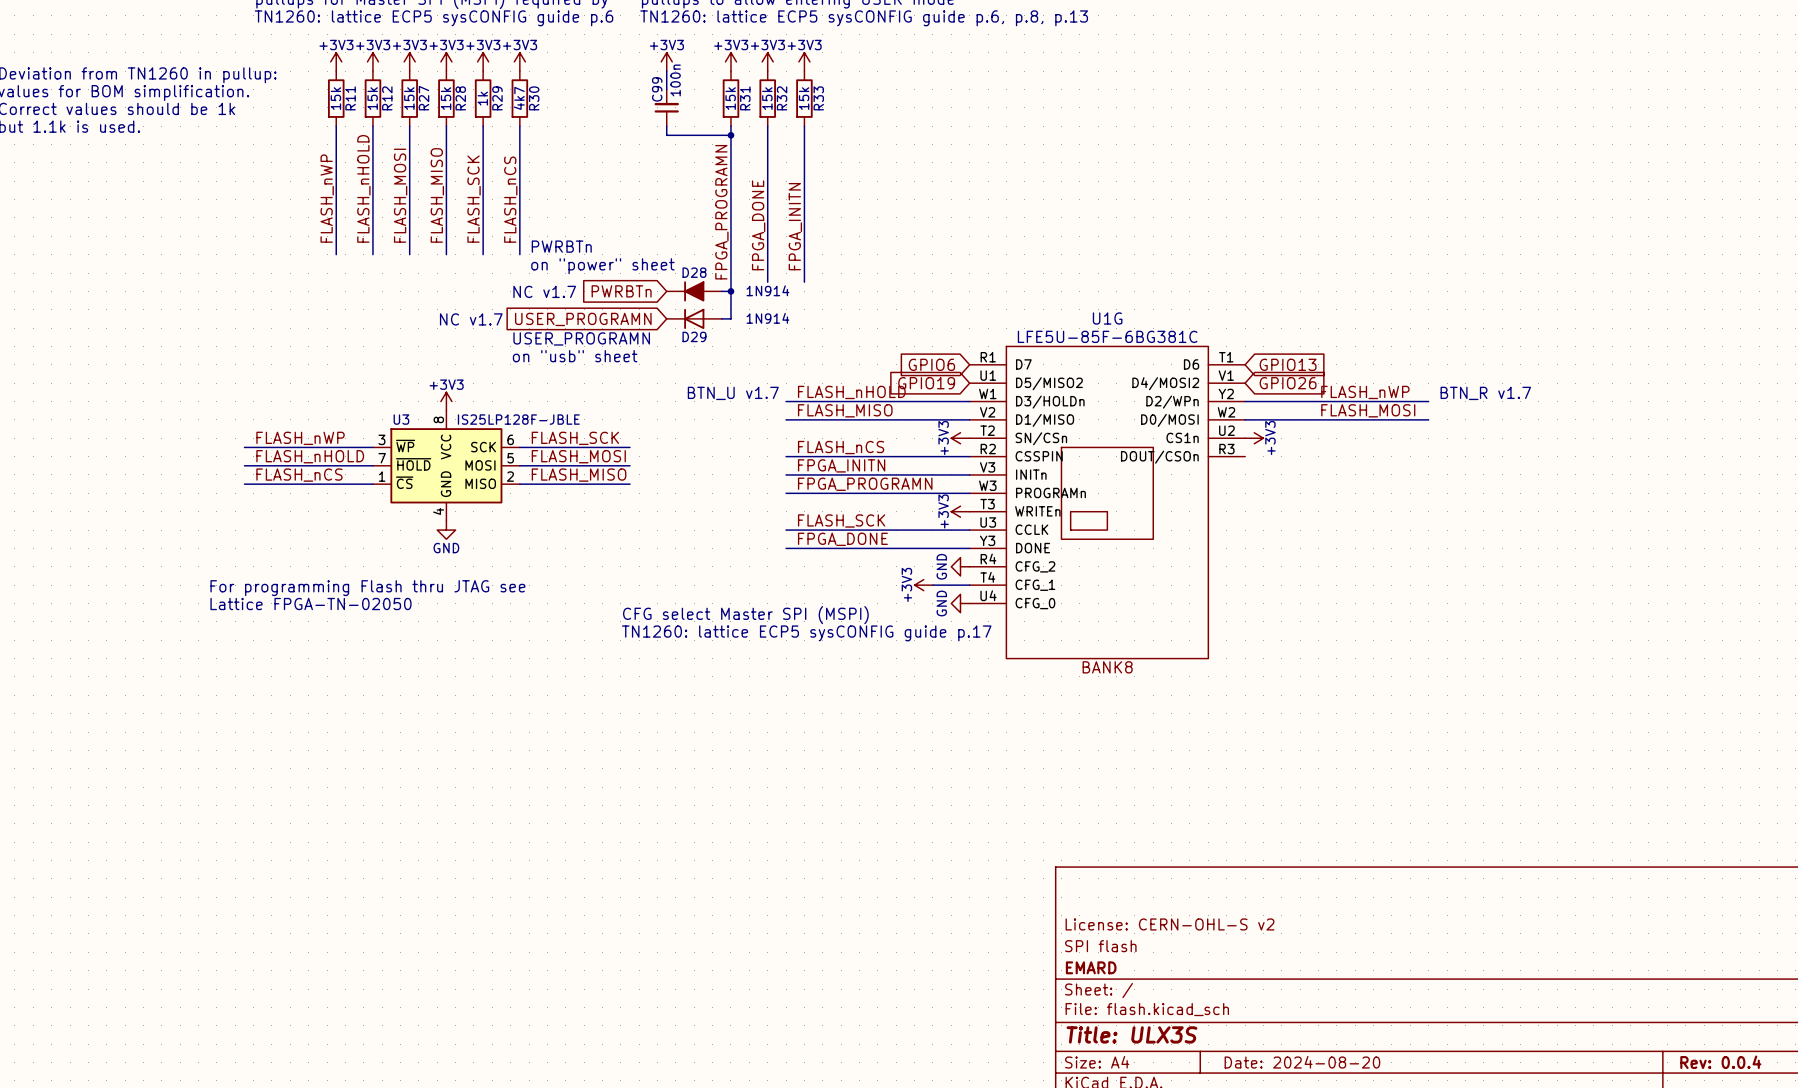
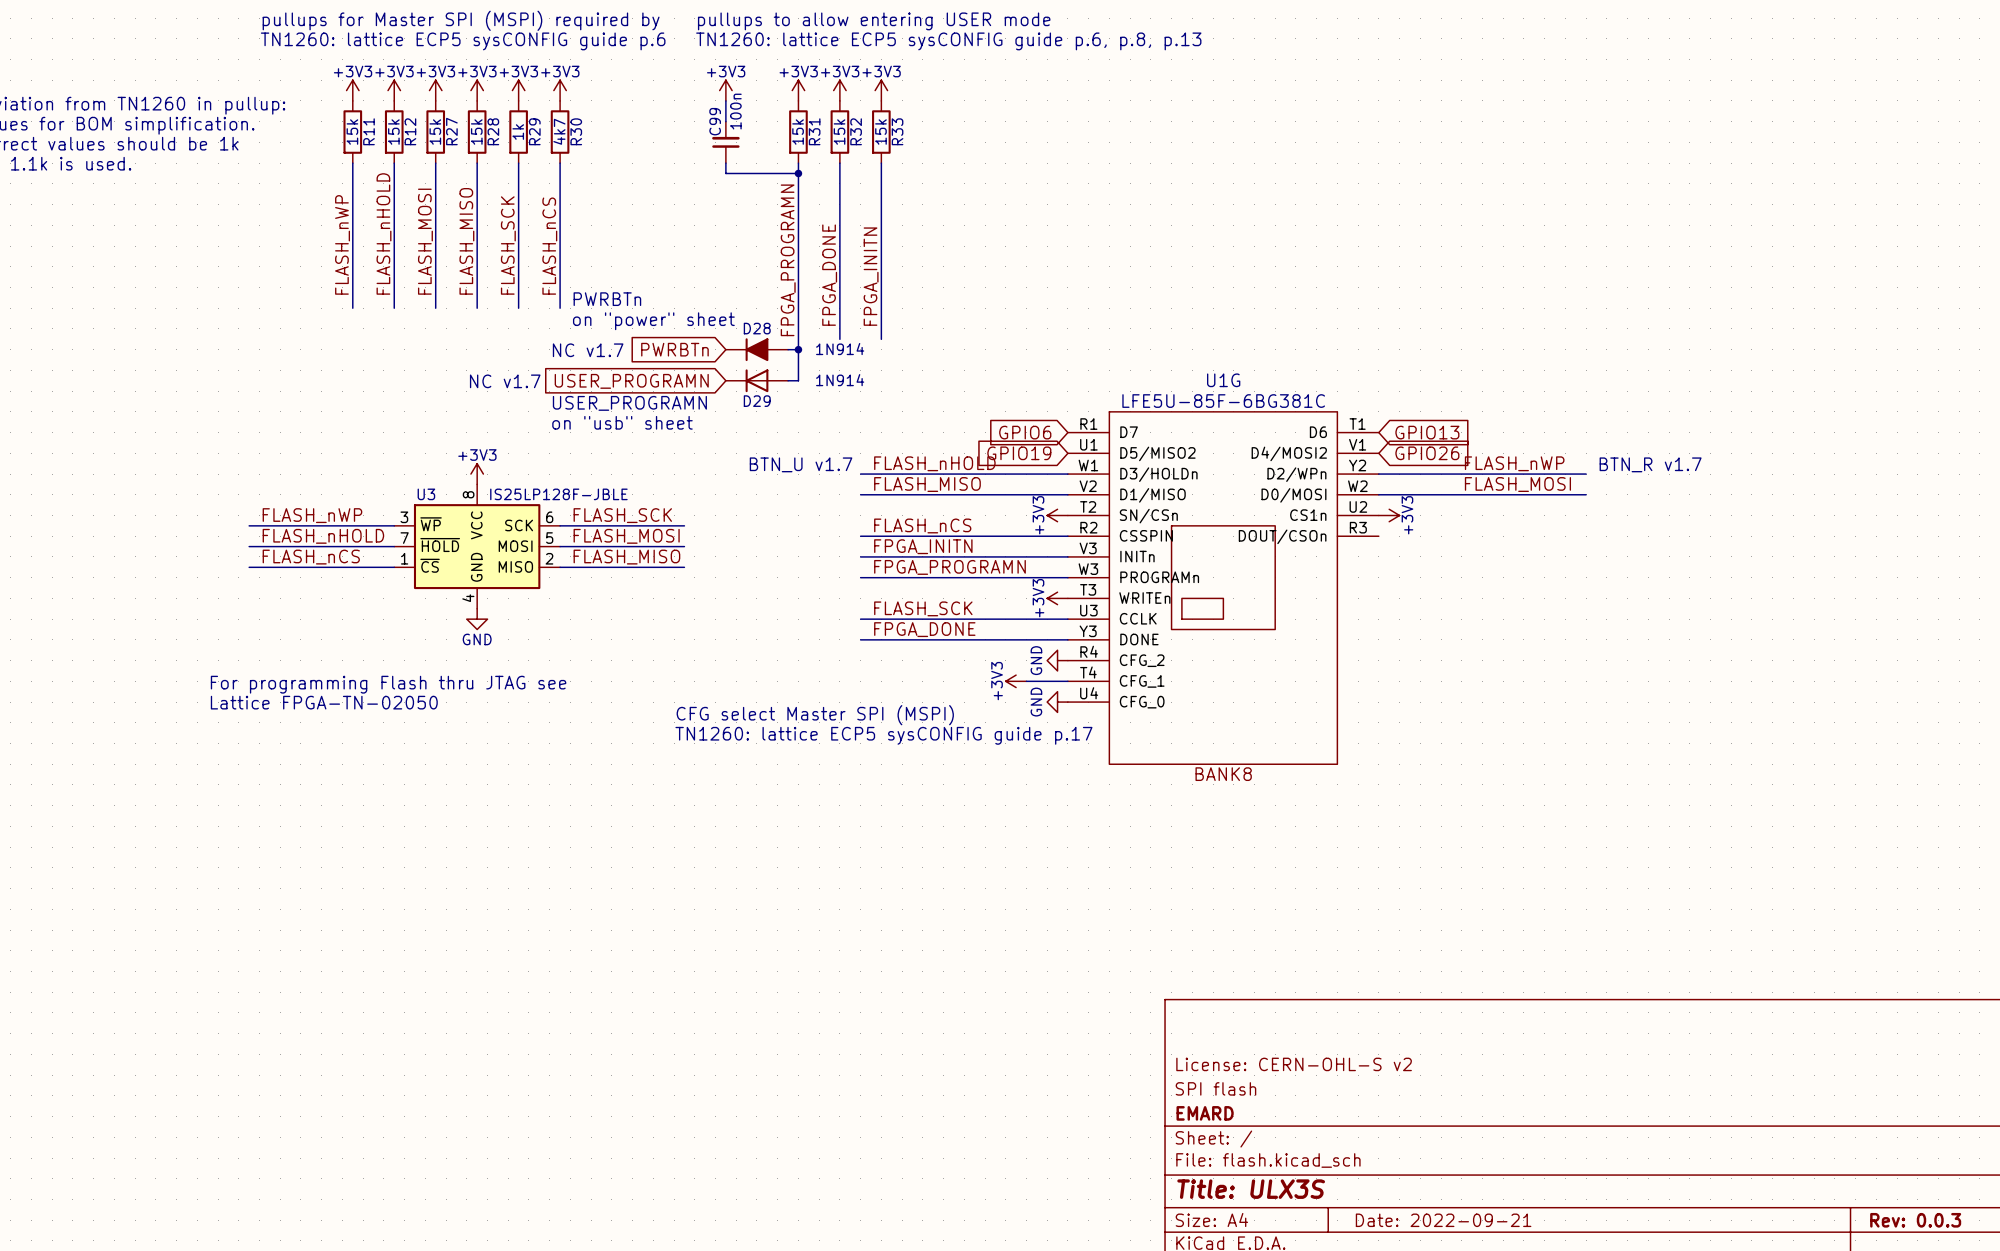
title block: Date: 2024-08-20 (1302, 1062) -> Date: 2022-09-21 (1443, 1220)
title block: Rev: 0.0.4 (1720, 1062) -> Rev: 0.0.3 (1915, 1220)

